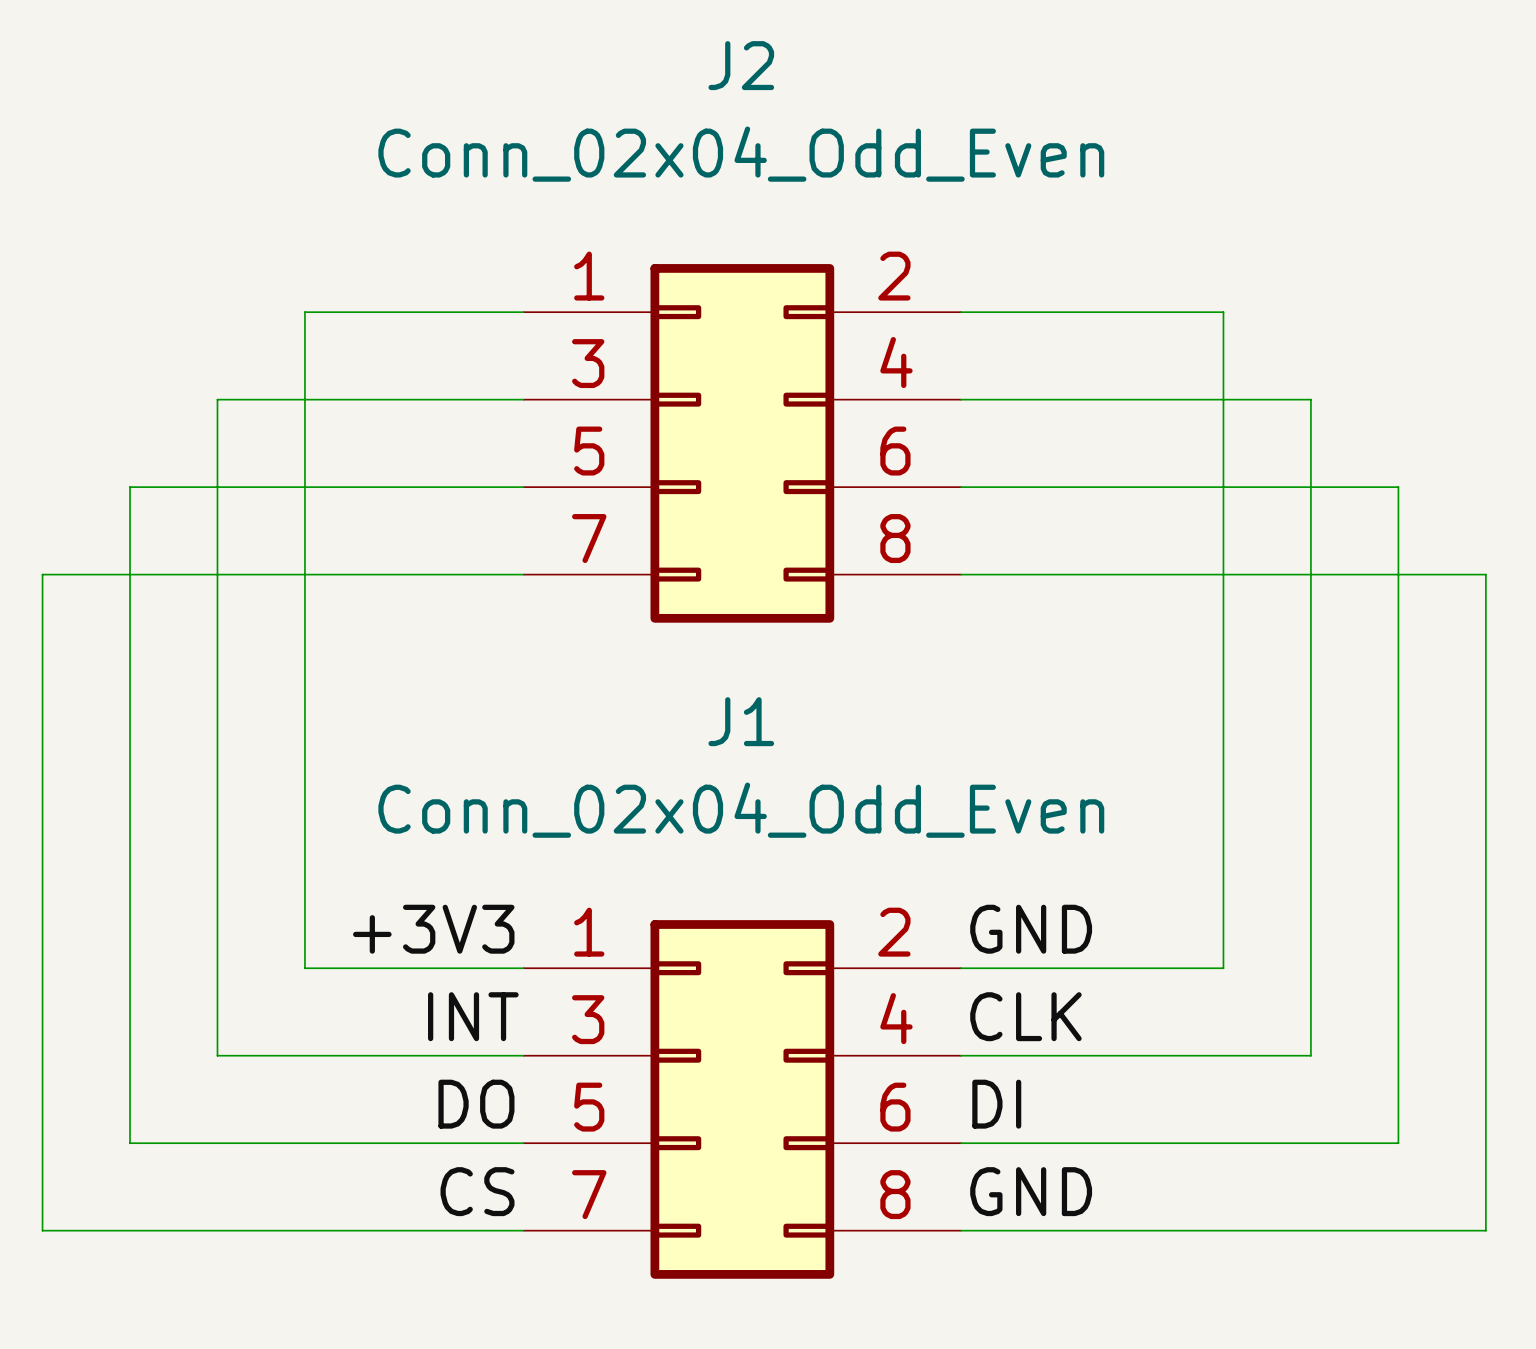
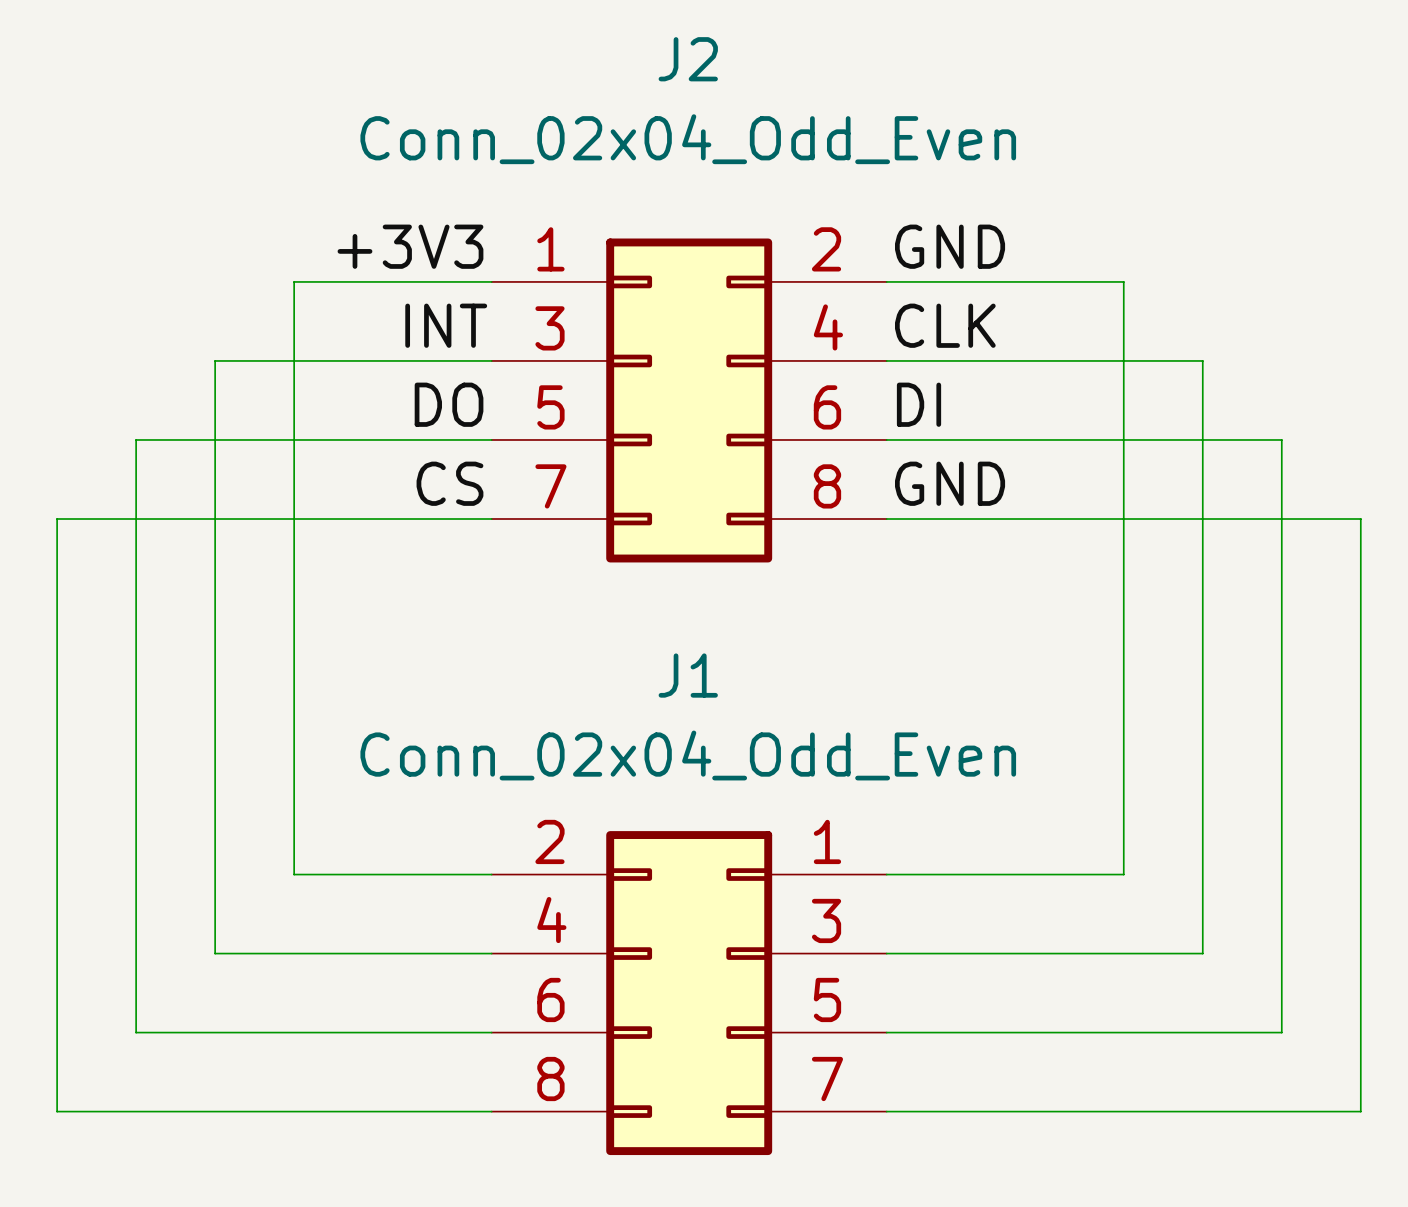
label: none -> GND (950, 246)
label: none -> GND (950, 483)
label position: +3V3 (433, 929) -> +3V3 (410, 246)
label: GND (1031, 929) -> none
label position: INT (473, 1016) -> INT (446, 325)
label position: CLK (1025, 1016) -> CLK (945, 325)
J1 flip: as is (742, 1099) -> left-right (689, 993)
label position: DO (476, 1104) -> DO (449, 404)
label position: DI (996, 1104) -> DI (919, 404)
label position: CS (477, 1191) -> CS (449, 483)
label: GND (1031, 1191) -> none

